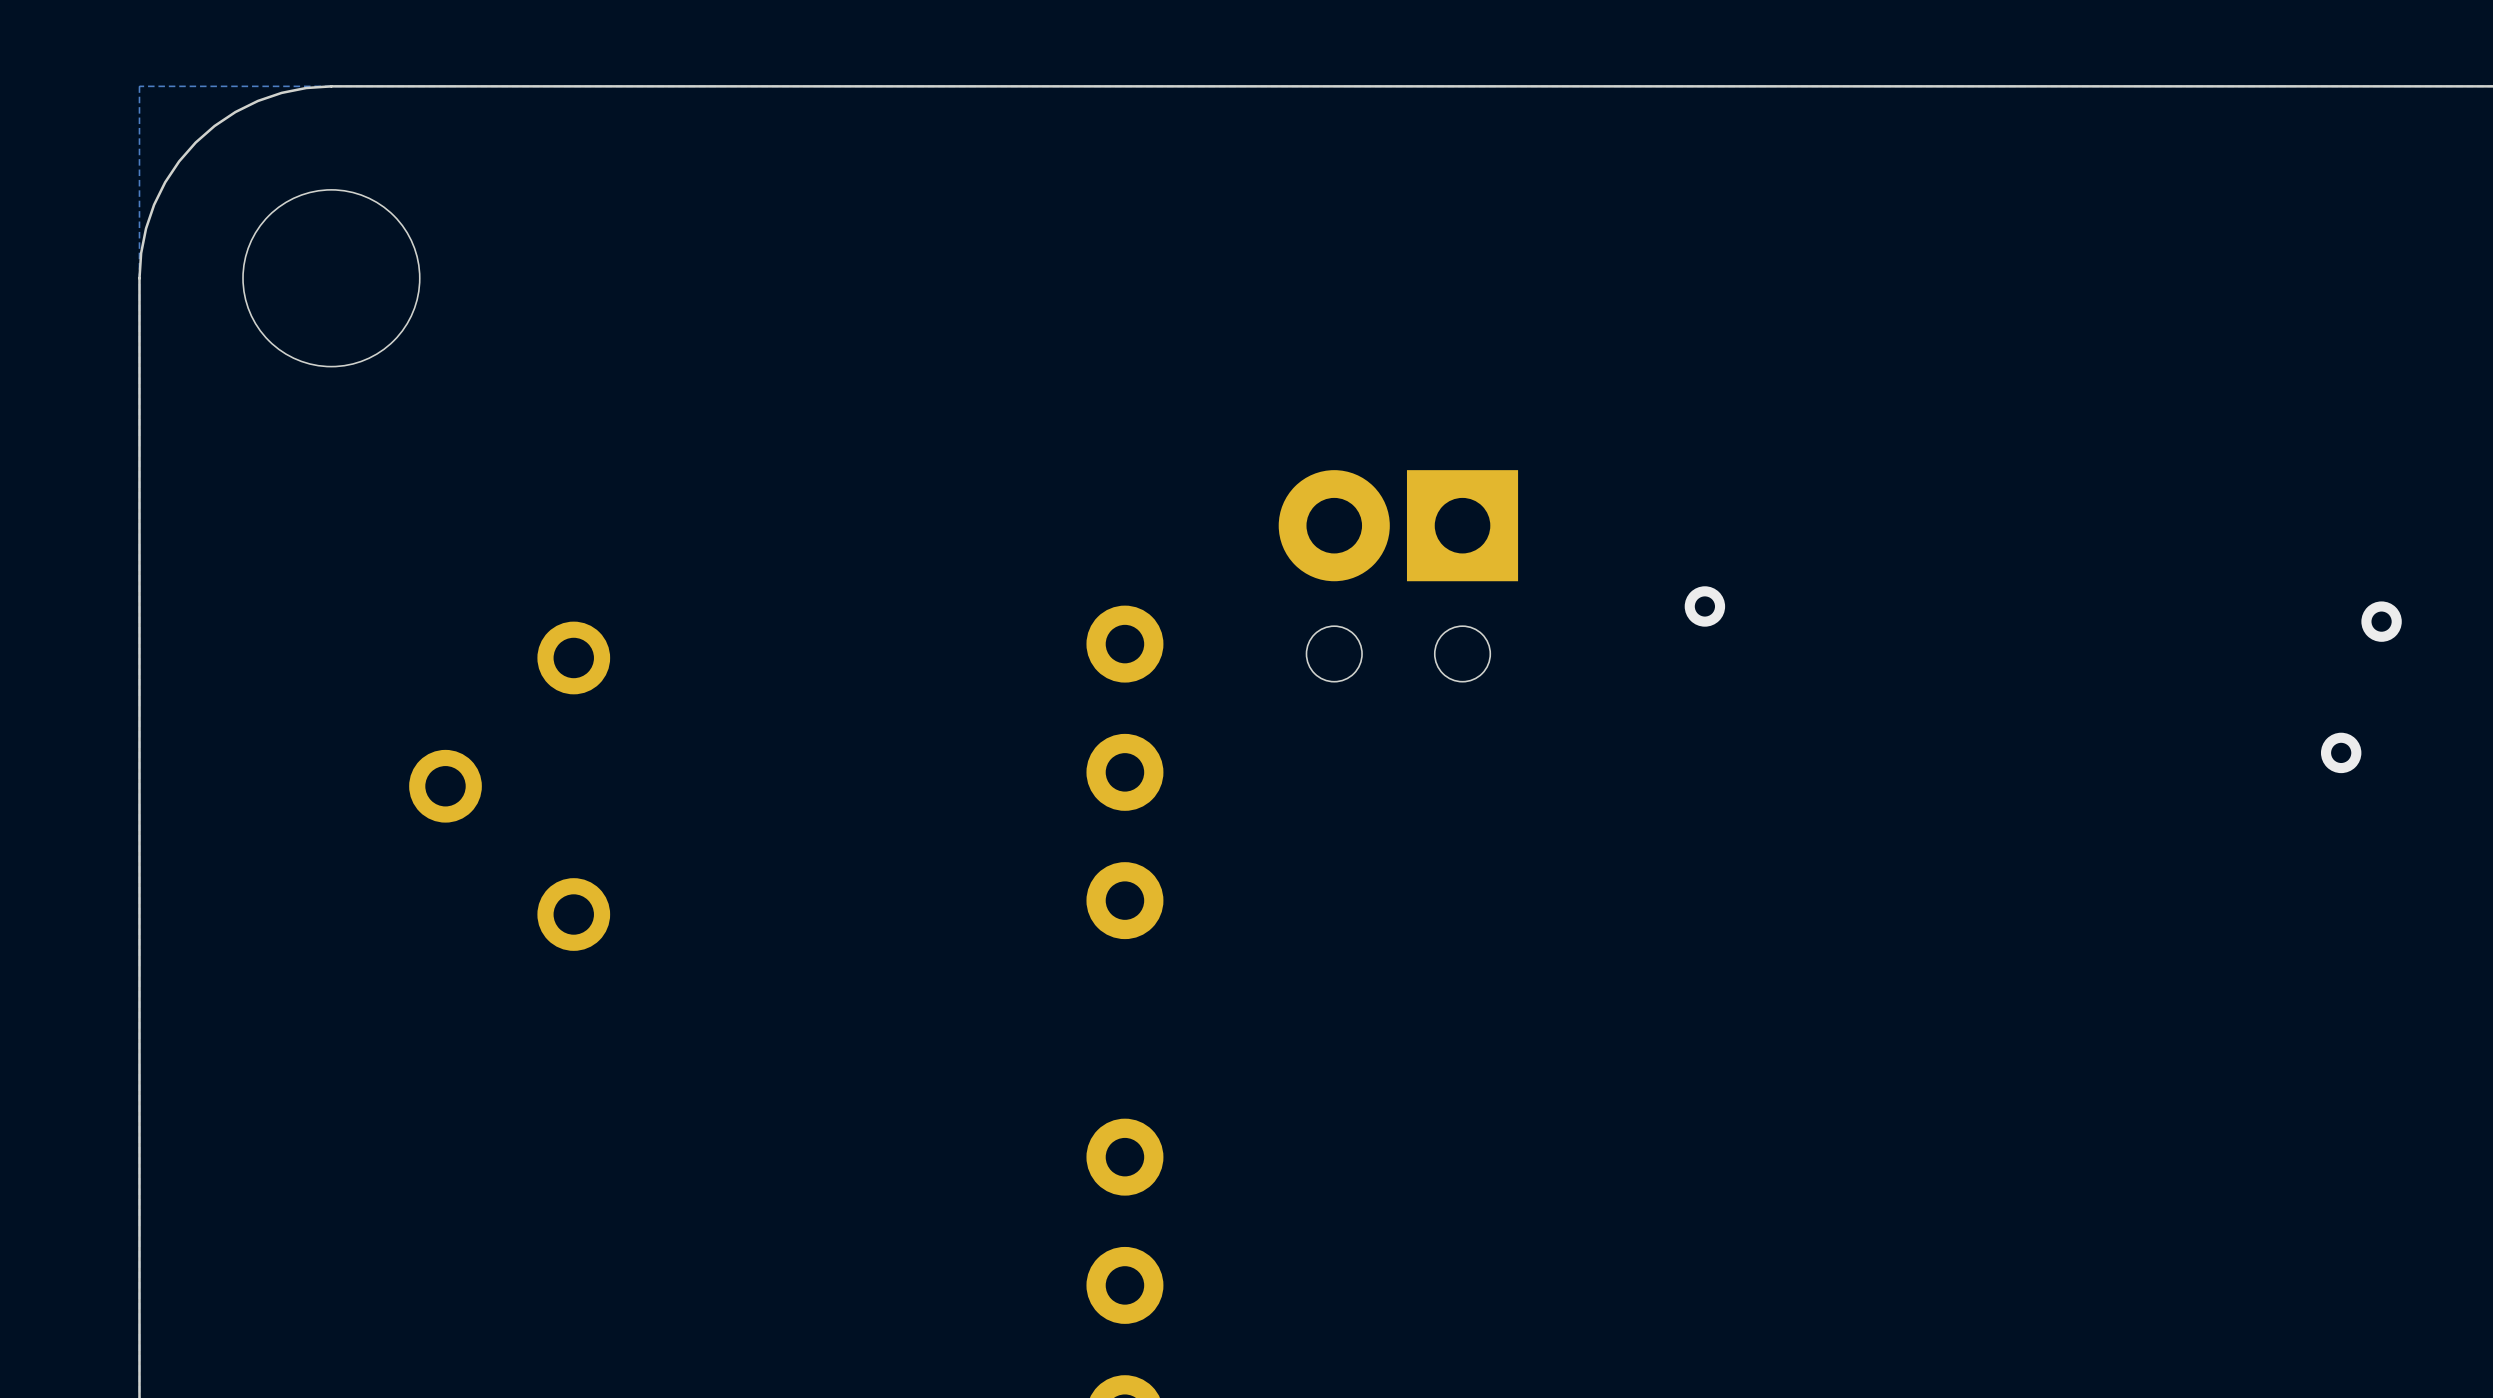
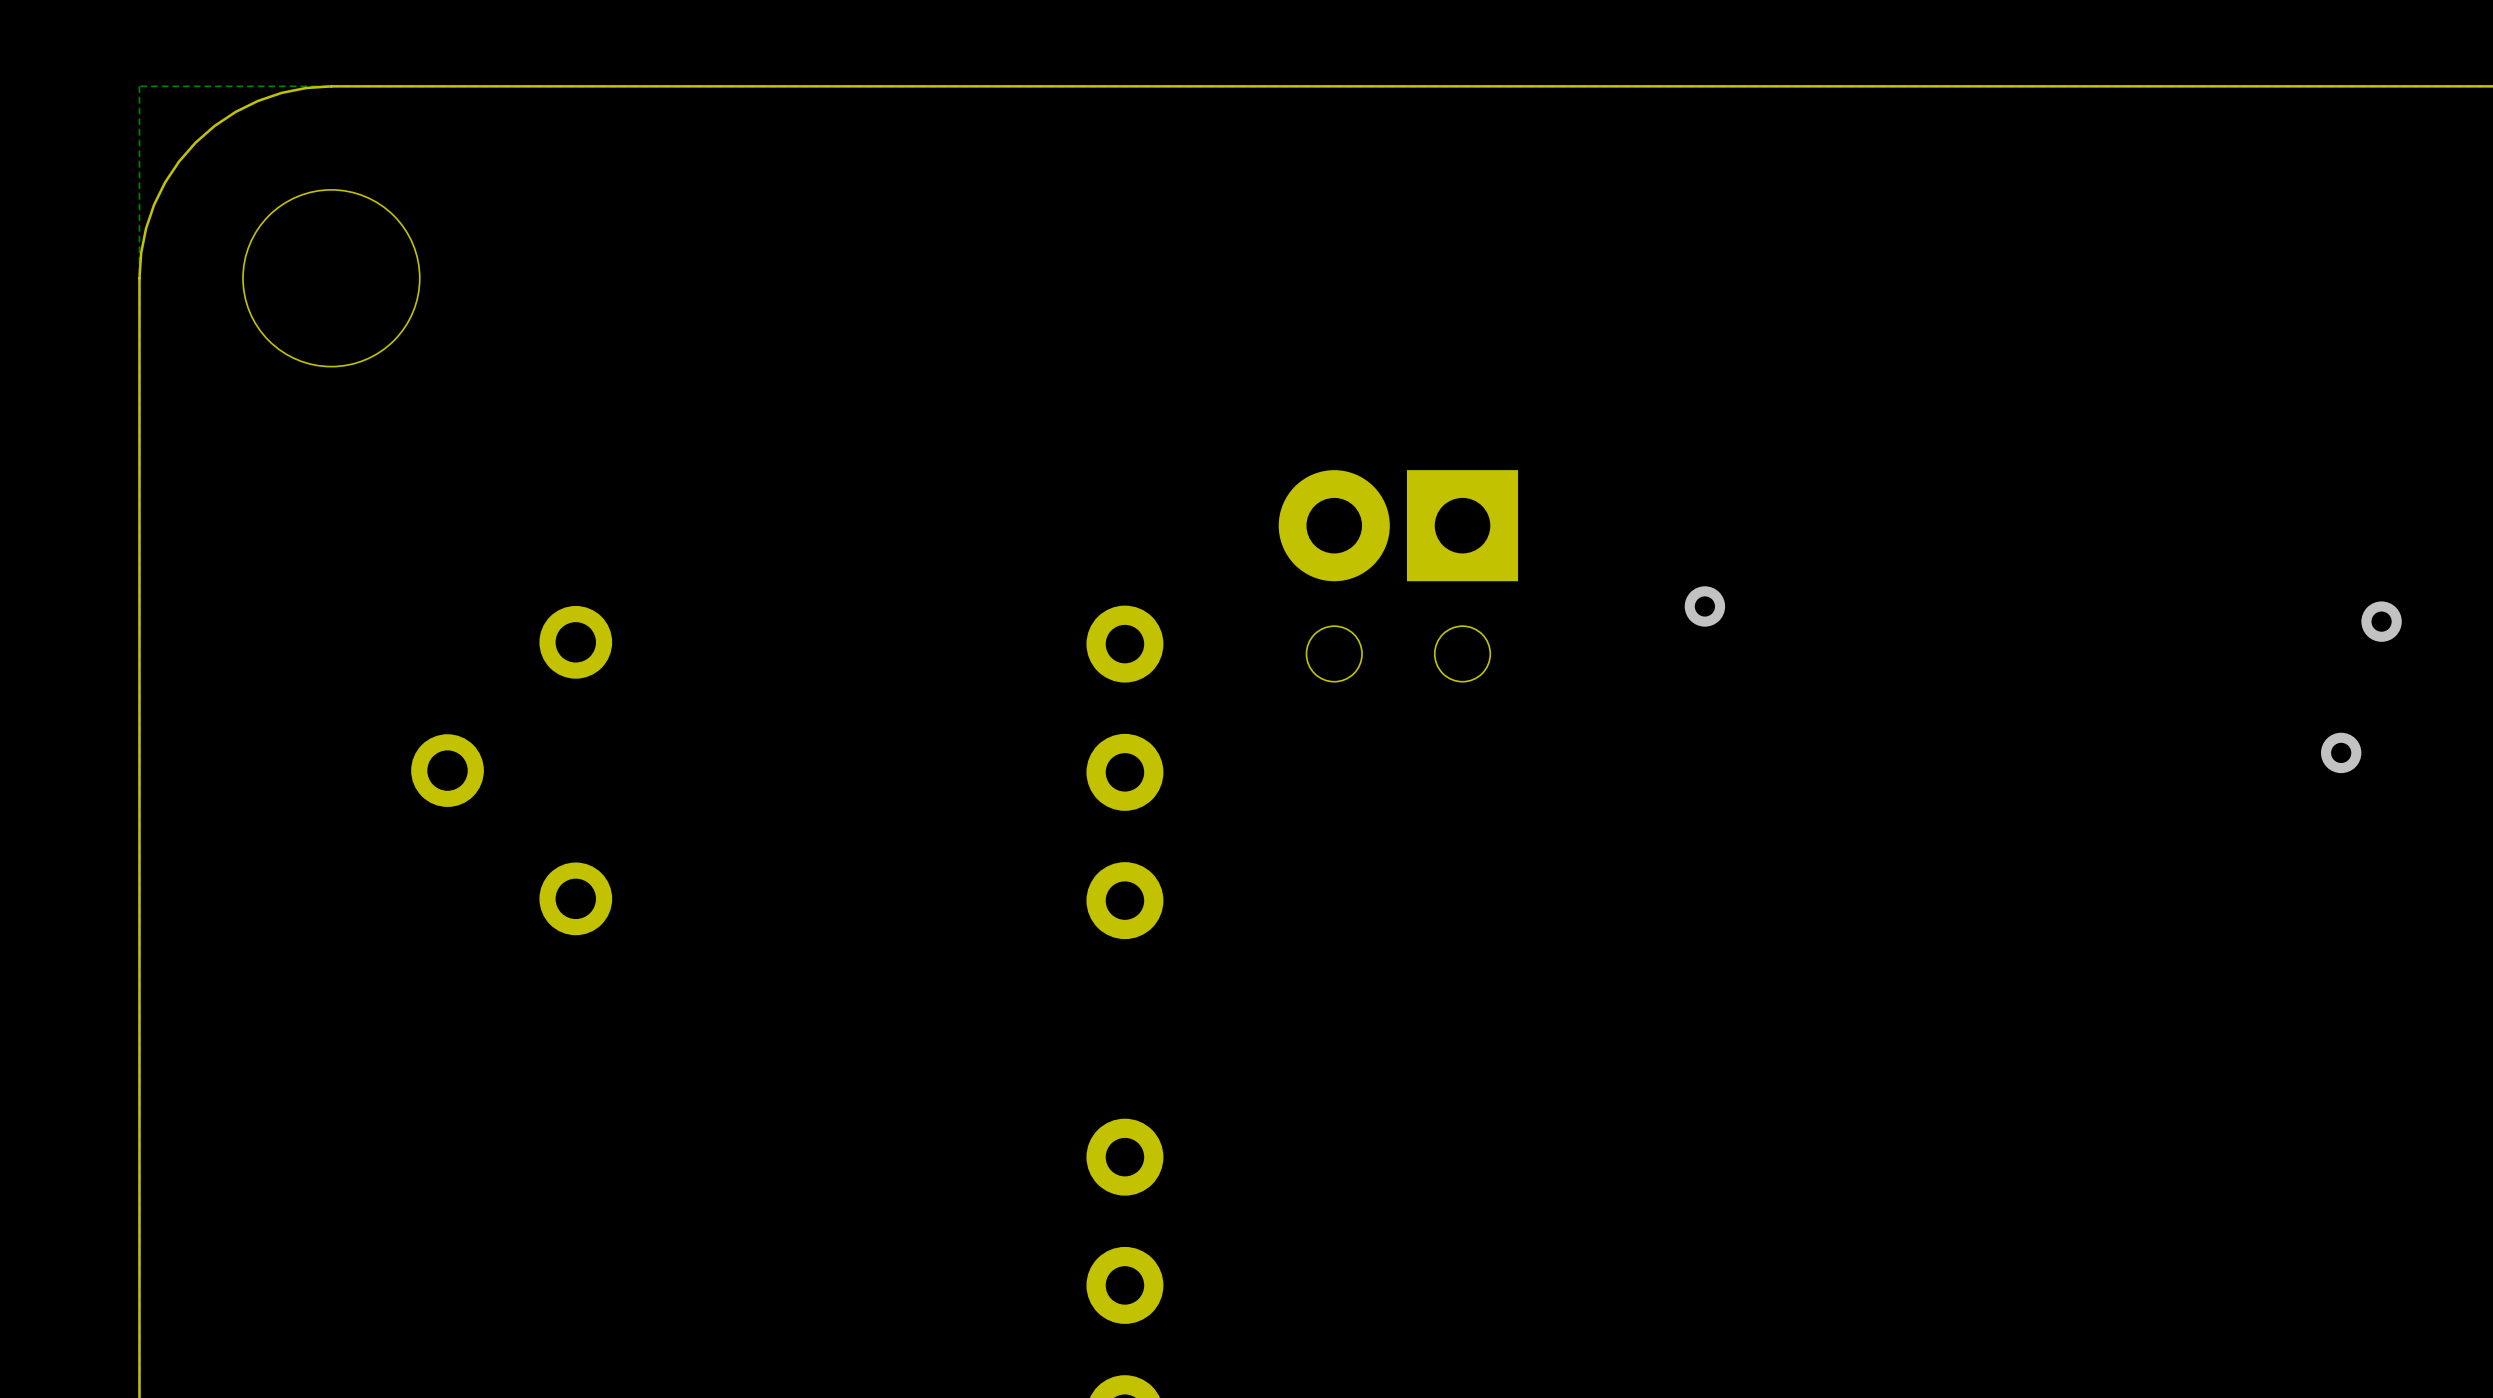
part position: (509, 786) -> (511, 770)

